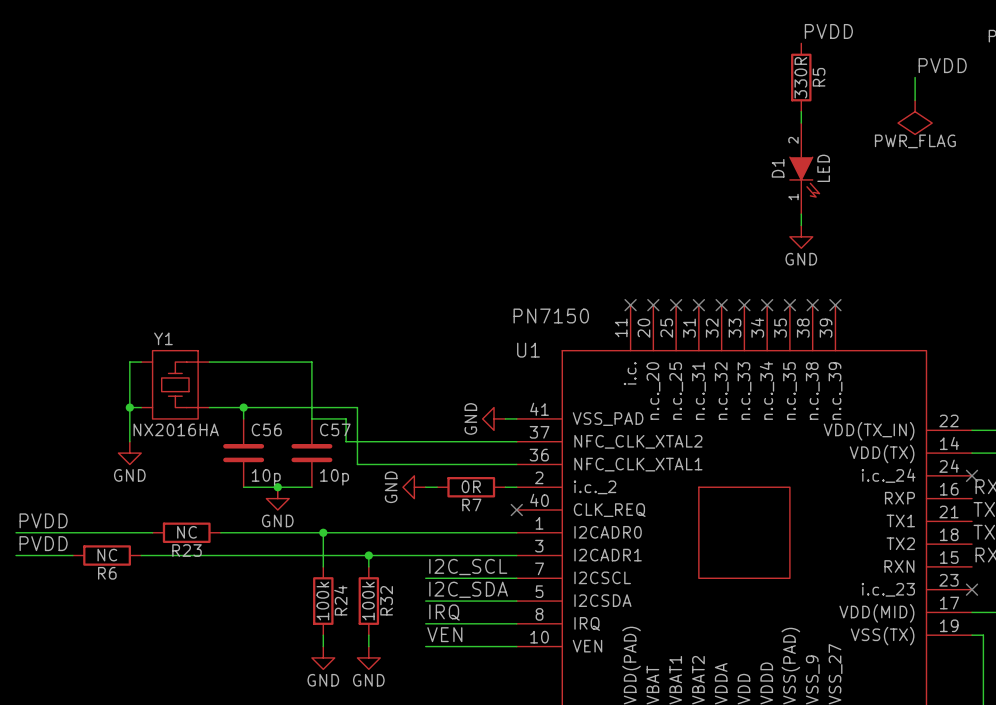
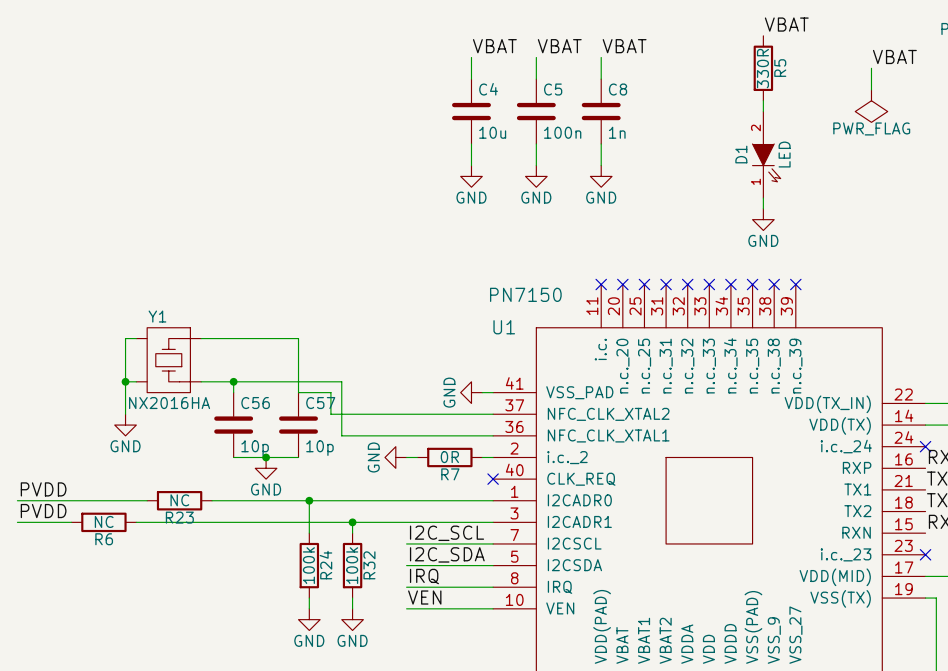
label: PVDD (828, 31) -> VBAT (786, 24)
label: none -> VBAT (494, 46)
label: none -> VBAT (559, 46)
label: none -> VBAT (624, 46)
label: PVDD (942, 65) -> VBAT (894, 56)
wire: none -> (471, 57) (471, 79)
wire: none -> (536, 57) (536, 79)
wire: none -> (601, 57) (601, 79)
C4: none -> 10u (471, 111)
C5: none -> 100n (536, 111)
C8: none -> 1n (601, 111)
wire: none -> (471, 143) (471, 165)
wire: none -> (536, 143) (536, 165)
wire: none -> (601, 143) (601, 165)
power symbol: none -> GND (471, 176)
power symbol: none -> GND (536, 176)
power symbol: none -> GND (601, 176)

